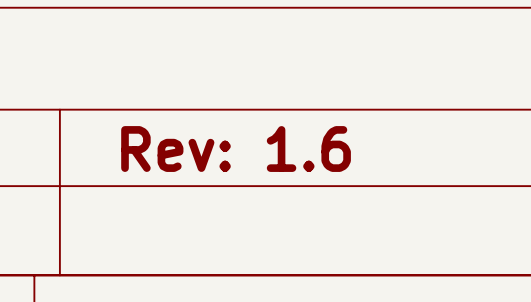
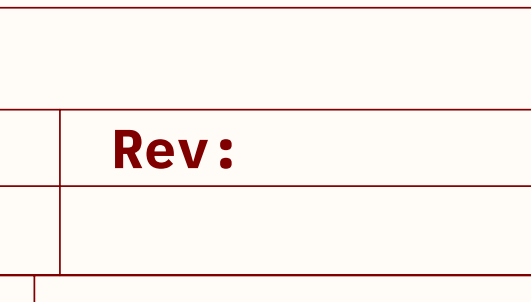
title block: Rev: 1.6 (236, 149) -> Rev: (173, 149)

